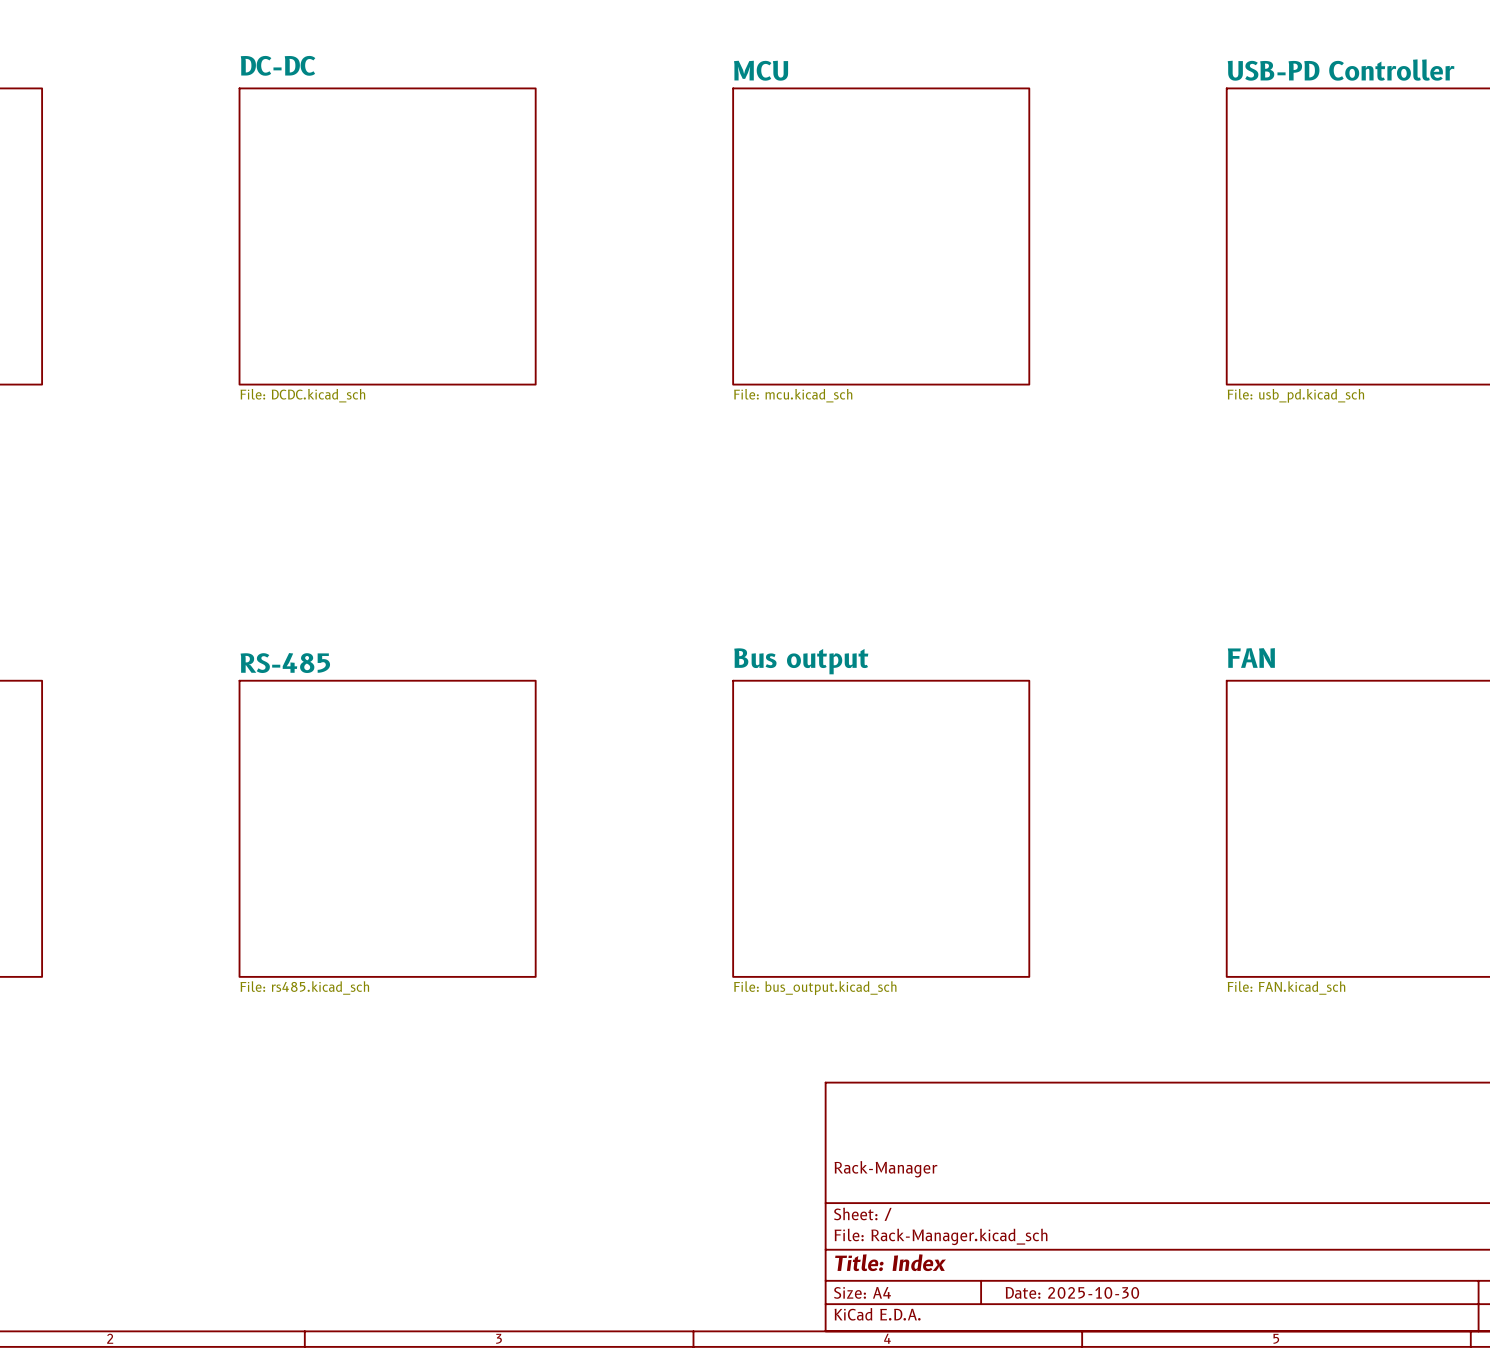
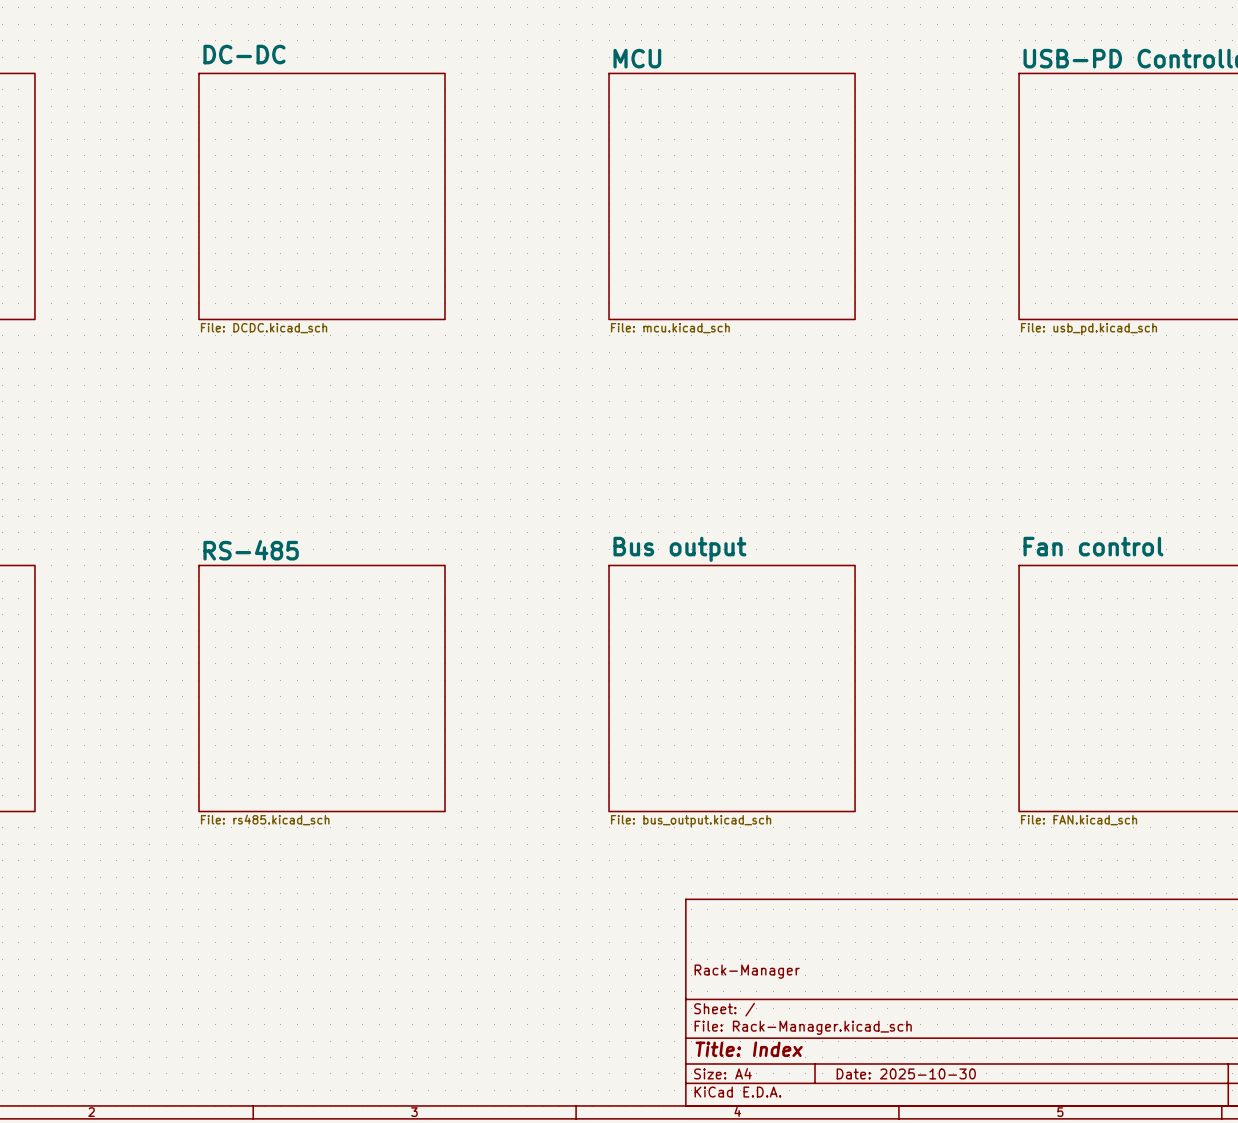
sheet FAN name: FAN (1251, 657) -> Fan control (1093, 546)

